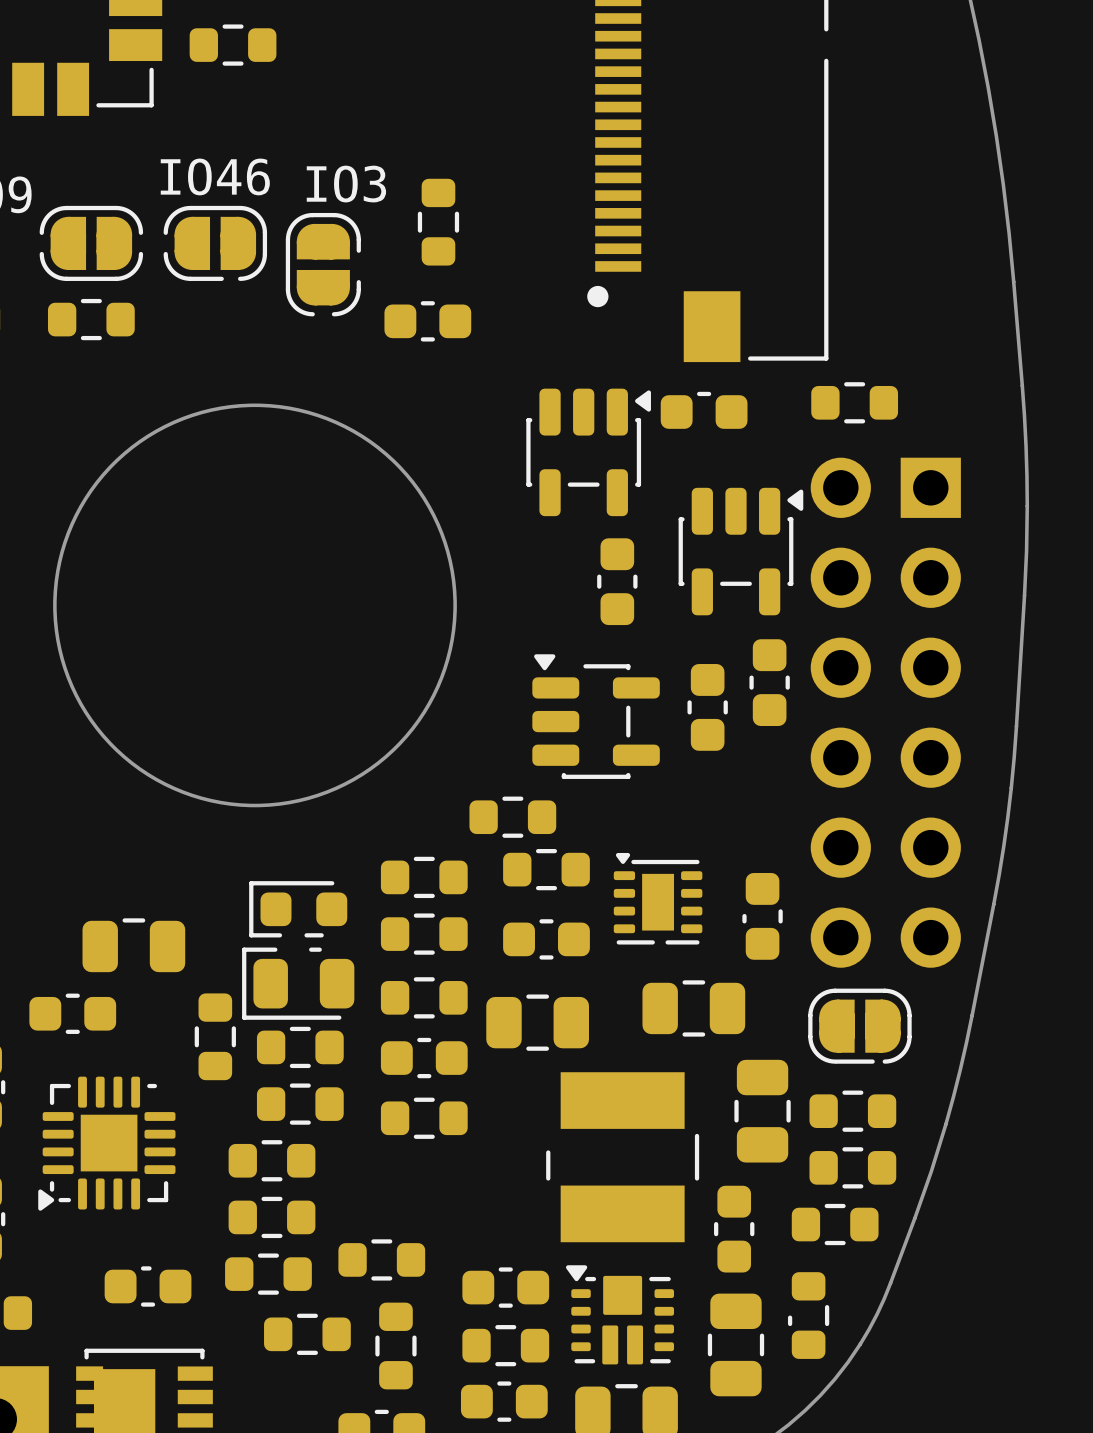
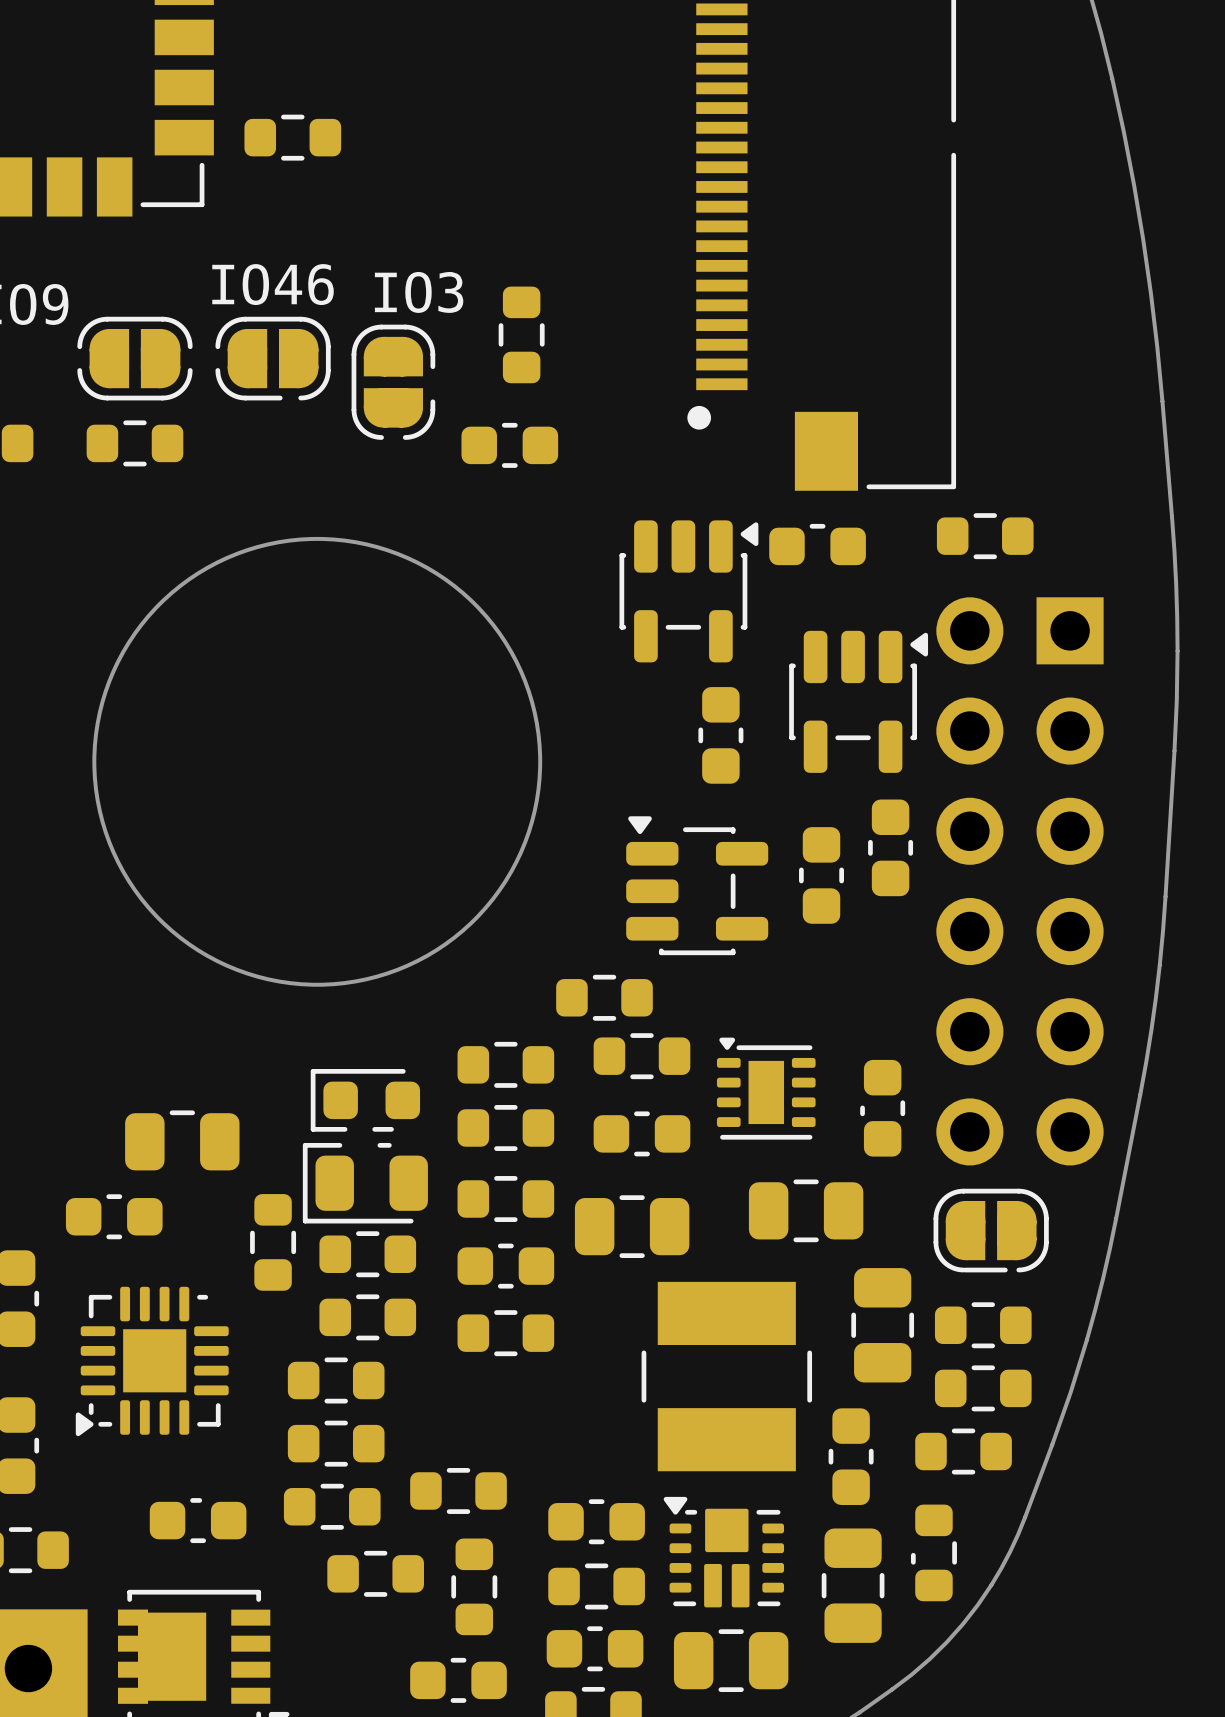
part footprint: [613, 852, 703, 945] -> [716, 1037, 816, 1140]
part footprint: [546, 1072, 700, 1243] -> [641, 1281, 813, 1472]

